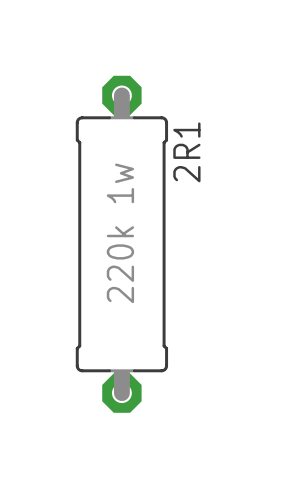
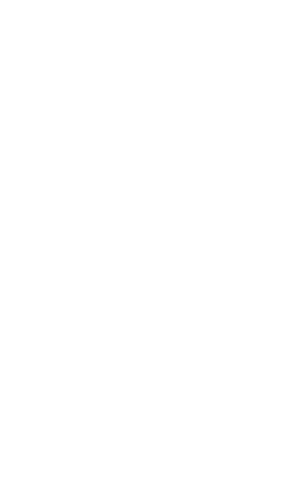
2R1: 220k 1w (121, 244) -> none

